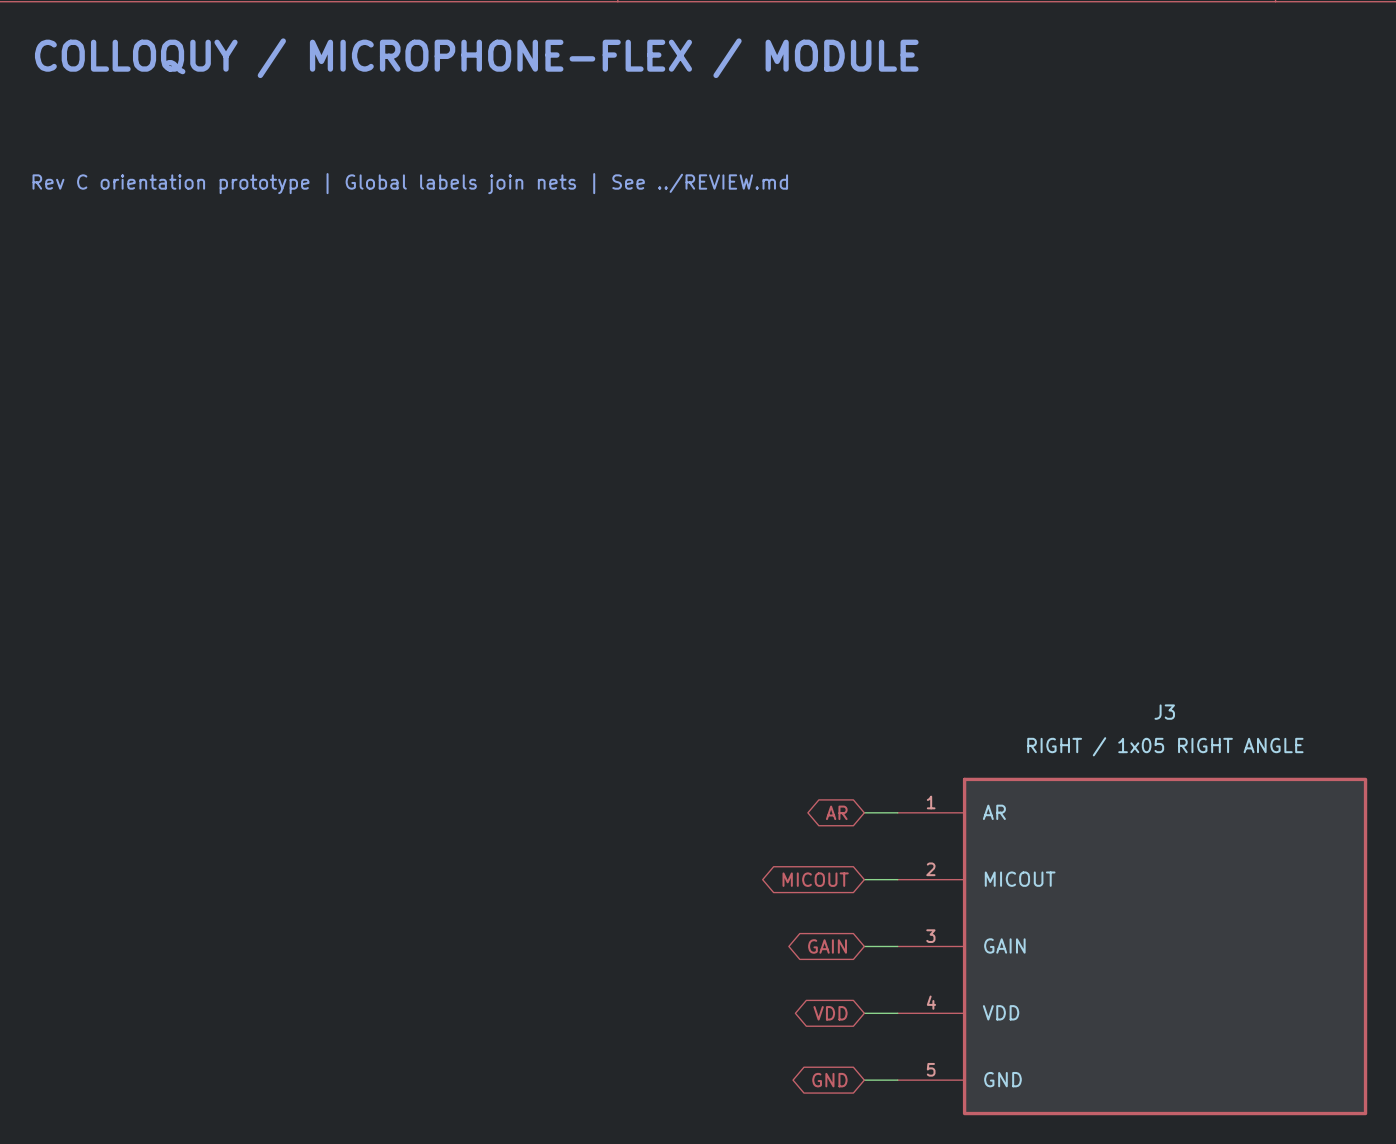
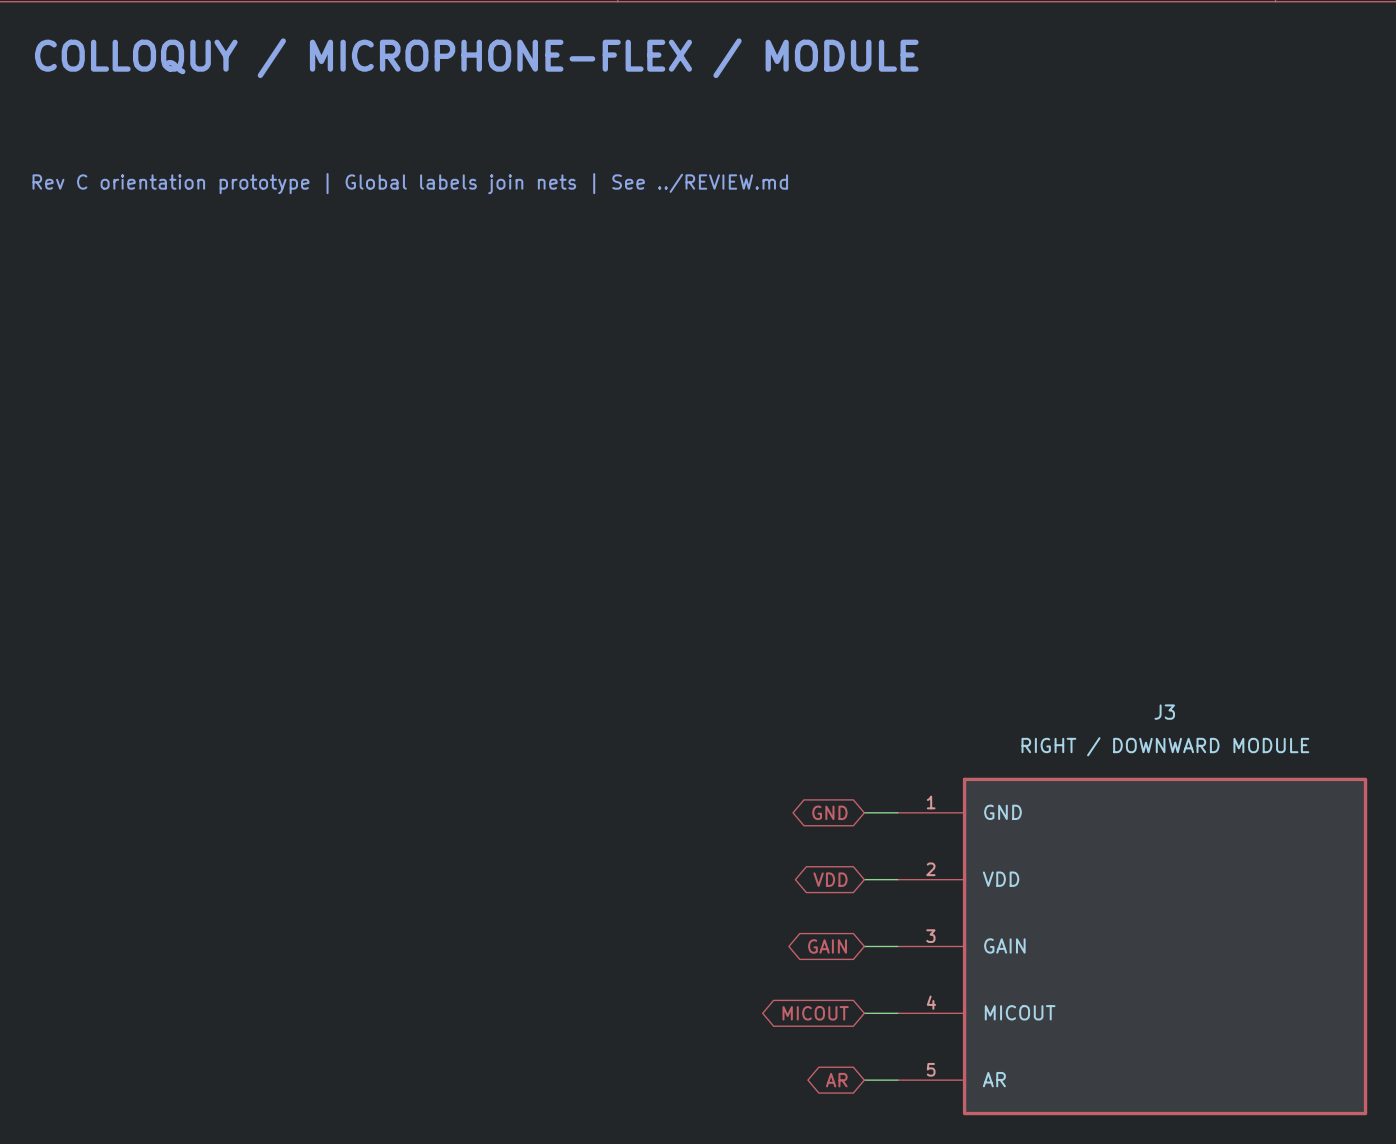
J3 value: RIGHT / 1x05 RIGHT ANGLE (1165, 746) -> RIGHT / DOWNWARD MODULE (1165, 746)
global label: AR (836, 812) -> GND (829, 812)
J3 pin name: AR (994, 812) -> GND (1002, 812)
global label: MICOUT (815, 879) -> VDD (830, 879)
J3 pin name: MICOUT (1020, 879) -> VDD (1001, 879)
J3 pin name: VDD (1001, 1012) -> MICOUT (1020, 1012)
global label: VDD (830, 1013) -> MICOUT (815, 1013)
J3 pin name: GND (1002, 1079) -> AR (994, 1079)
global label: GND (829, 1080) -> AR (836, 1080)

